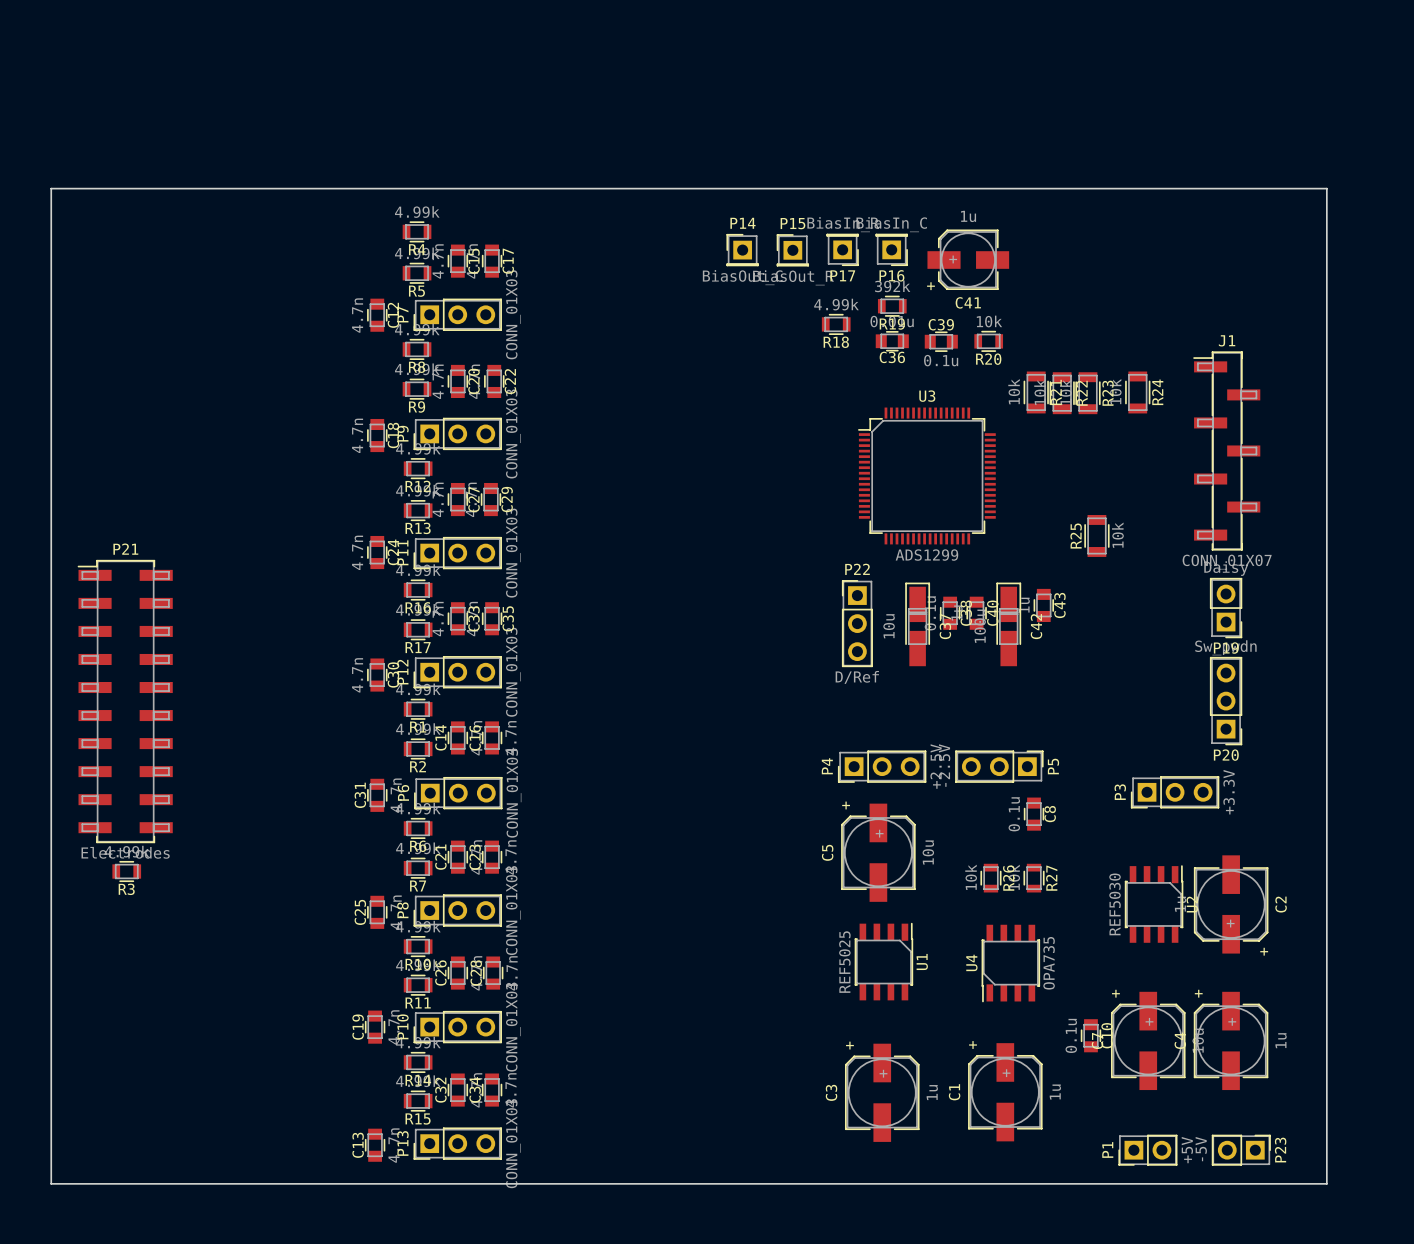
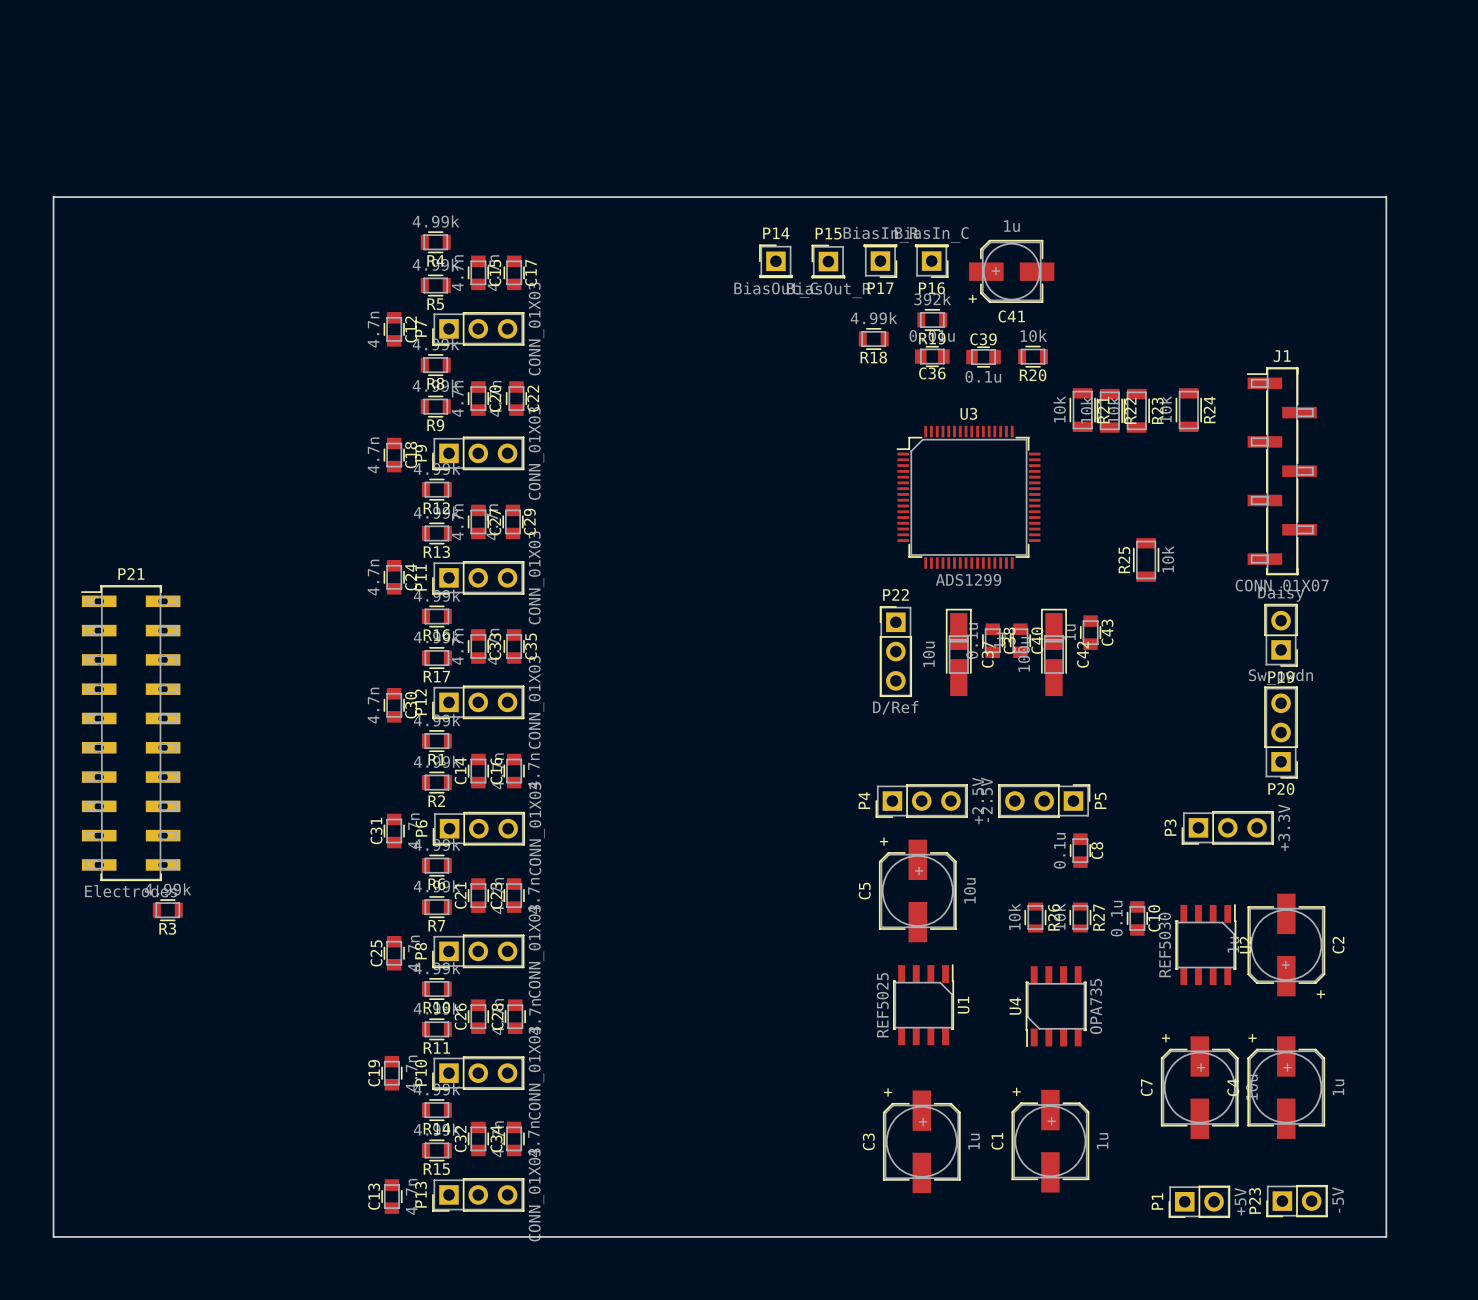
P21 footprint: [77, 560, 173, 844] -> [81, 585, 181, 881]
R3 position: (126, 871) -> (167, 910)
C10 position: (1090, 1035) -> (1137, 918)
P23 rotation: 0° (1241, 1150) -> 180° (1297, 1201)

